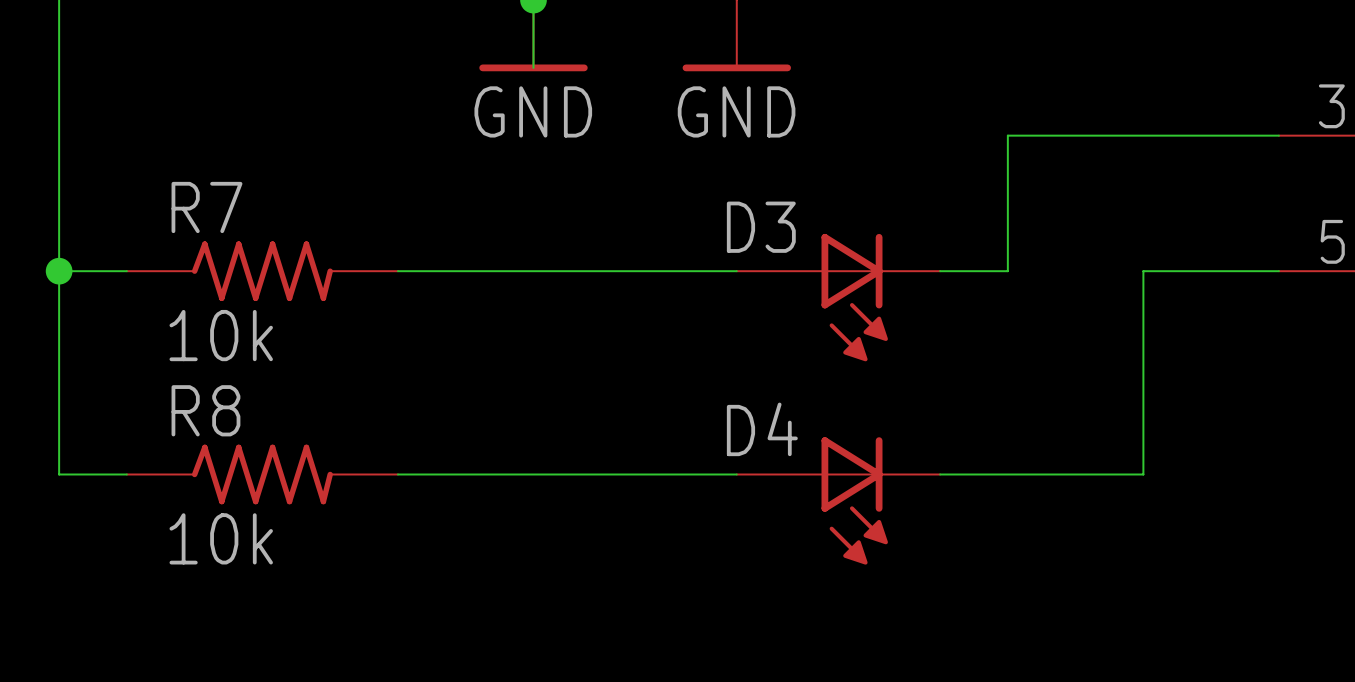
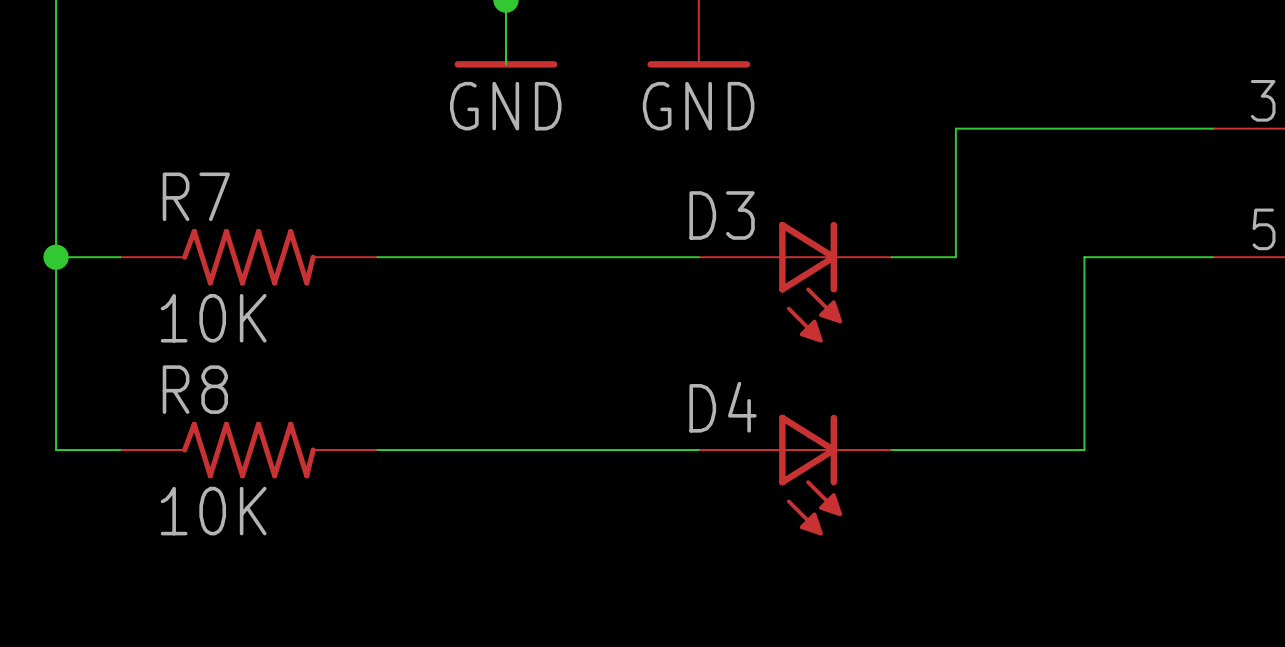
R7 value: 10k (221, 335) -> 10K (213, 318)
R8 value: 10k (221, 538) -> 10K (213, 511)

